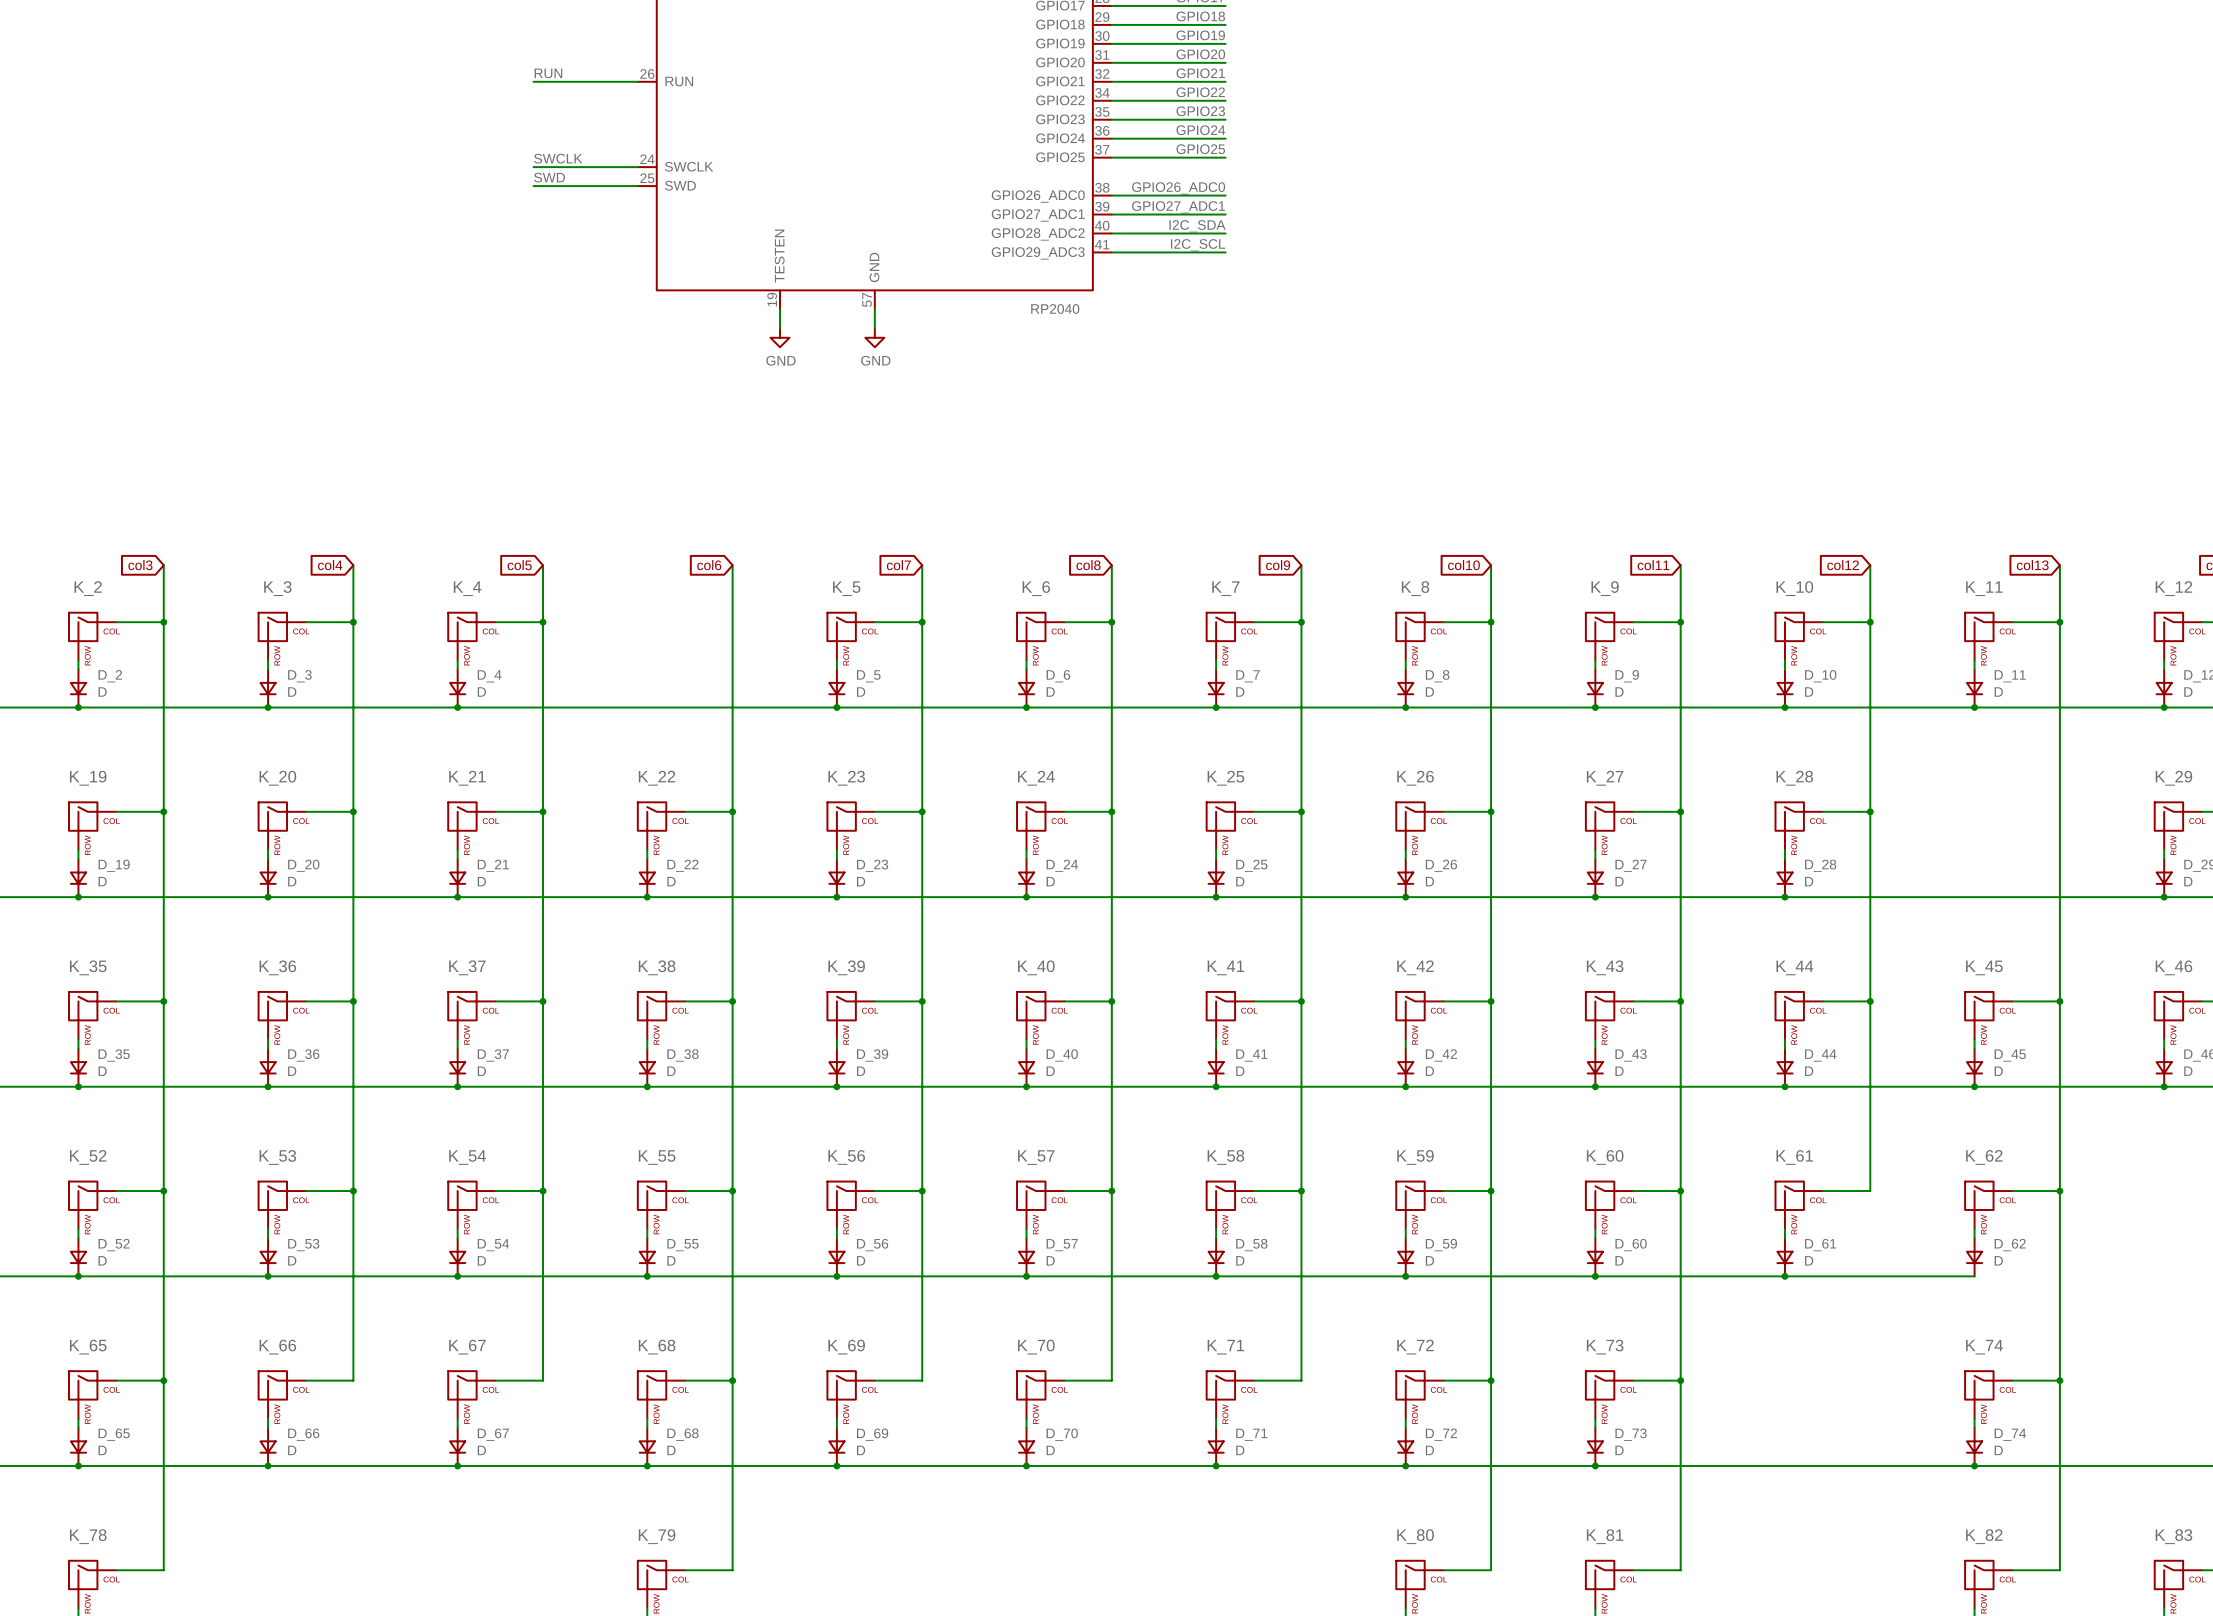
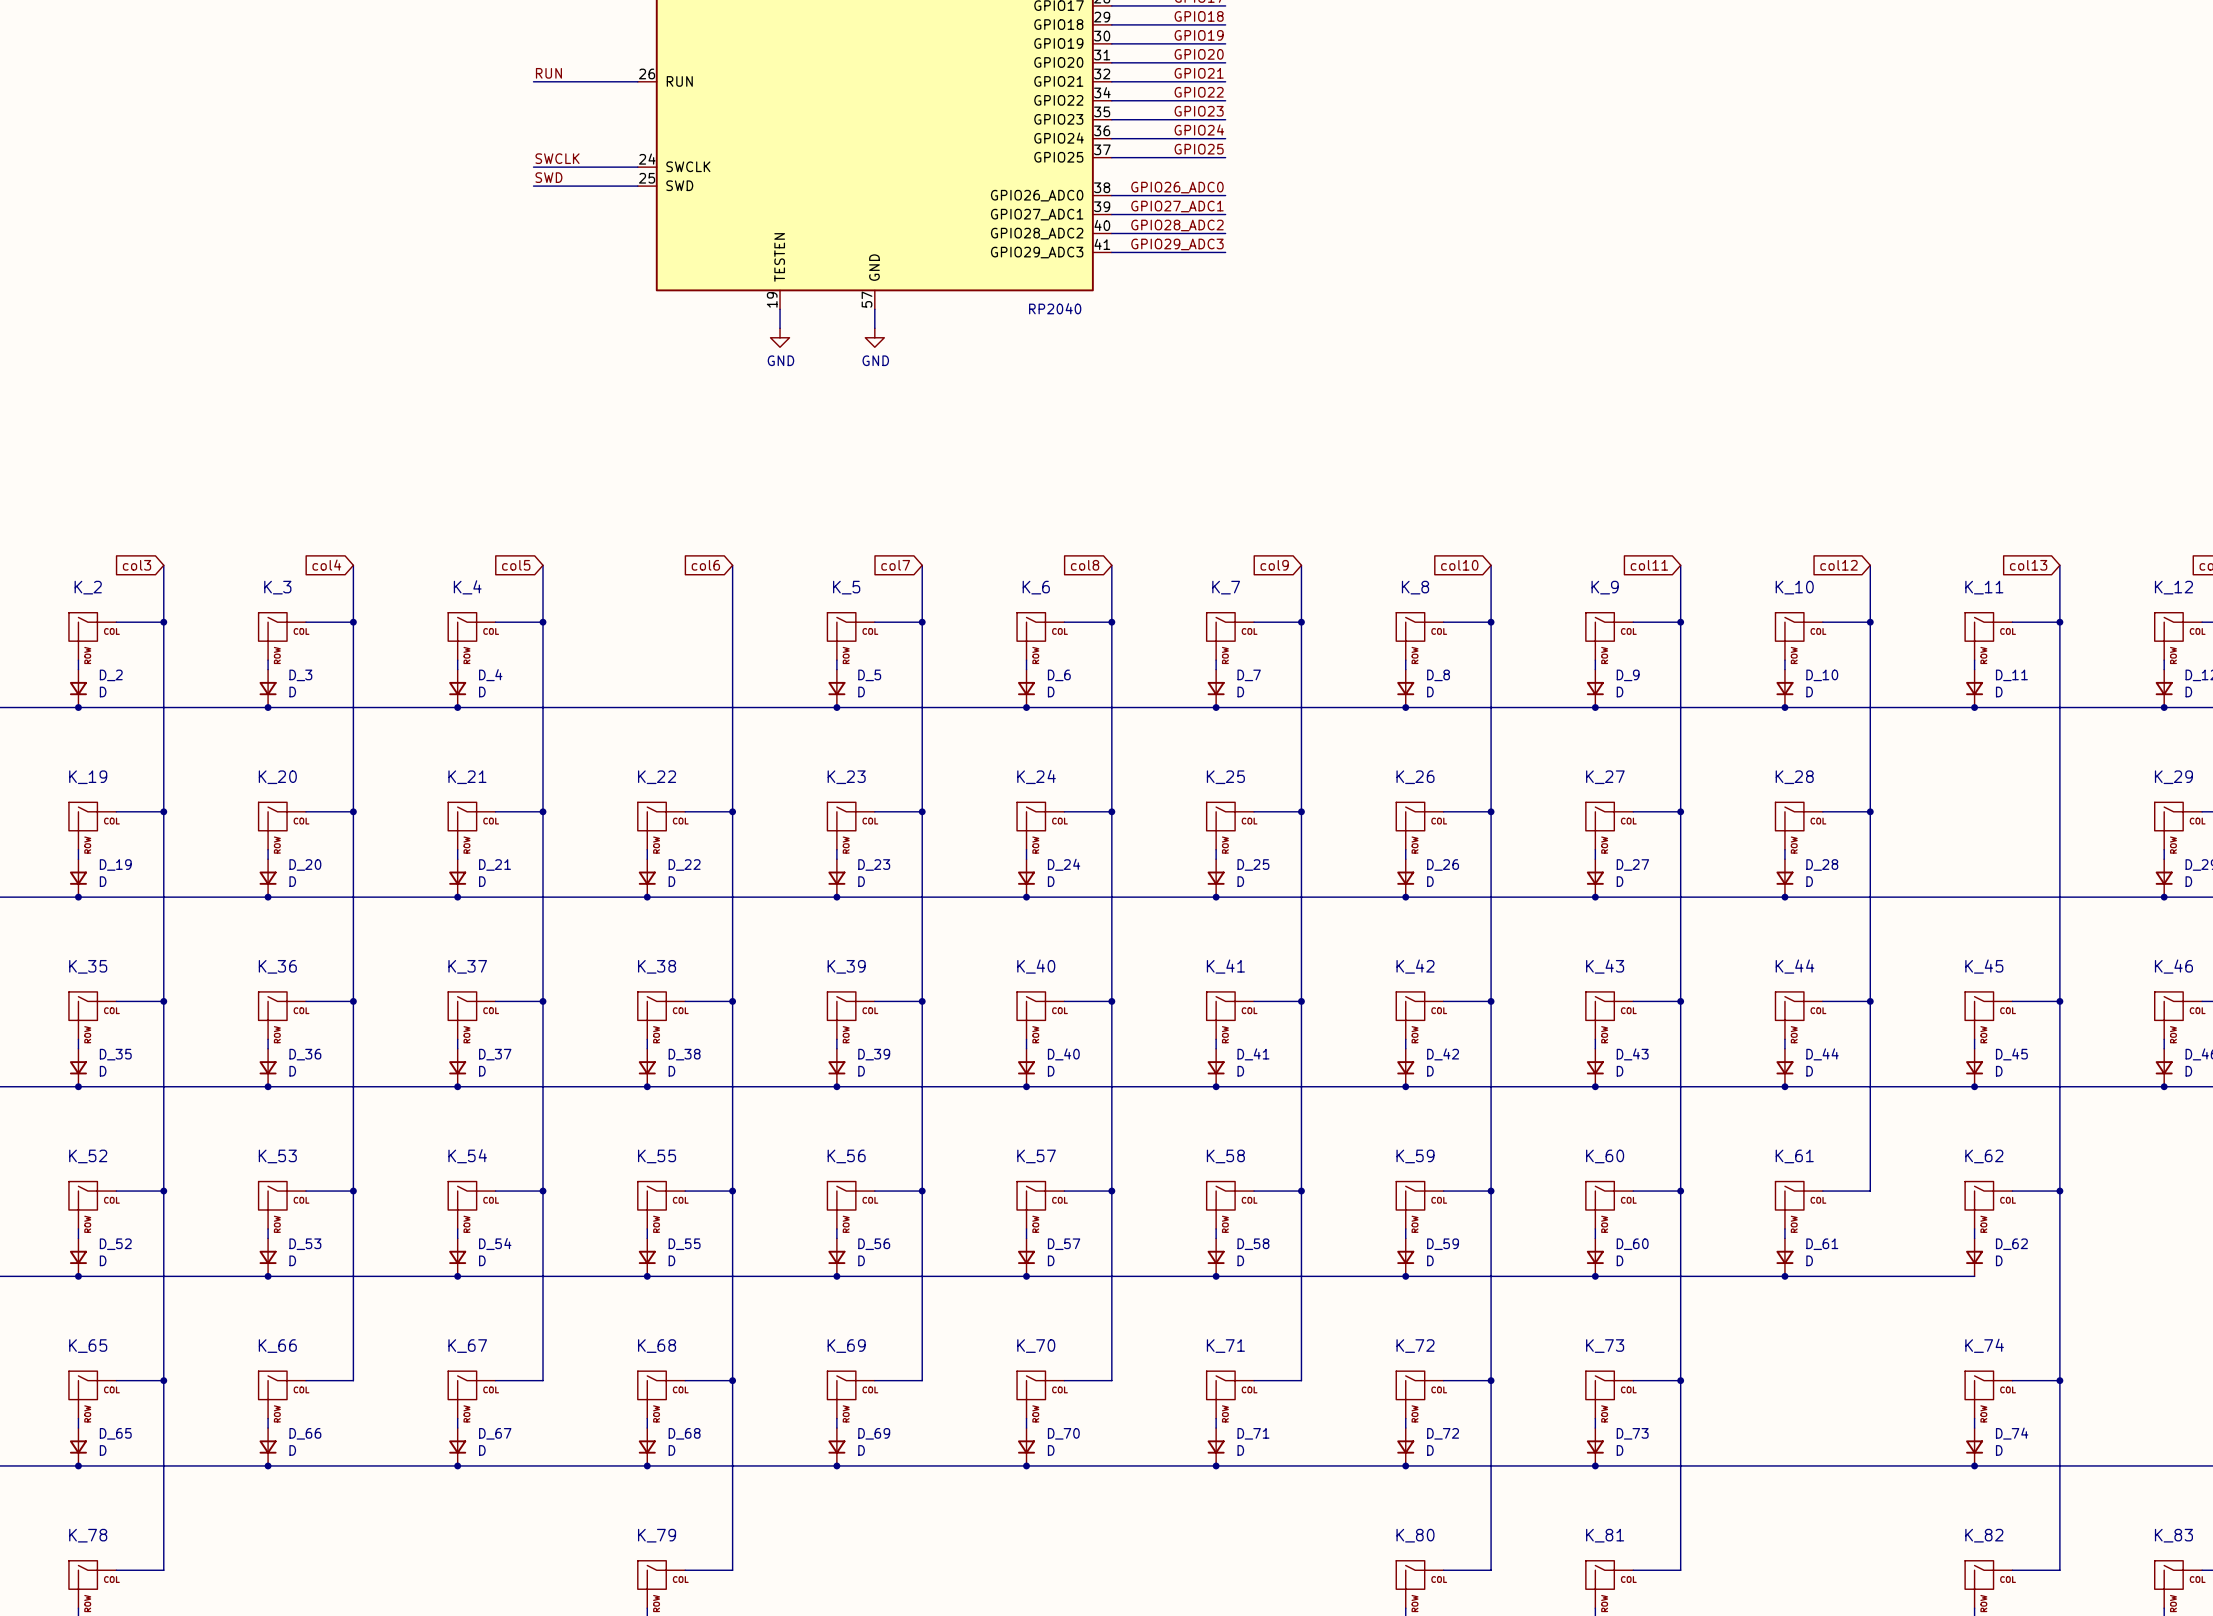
label: I2C_SDA (1197, 226) -> GPIO28_ADC2 (1177, 225)
label: I2C_SCL (1198, 245) -> GPIO29_ADC3 (1177, 244)

